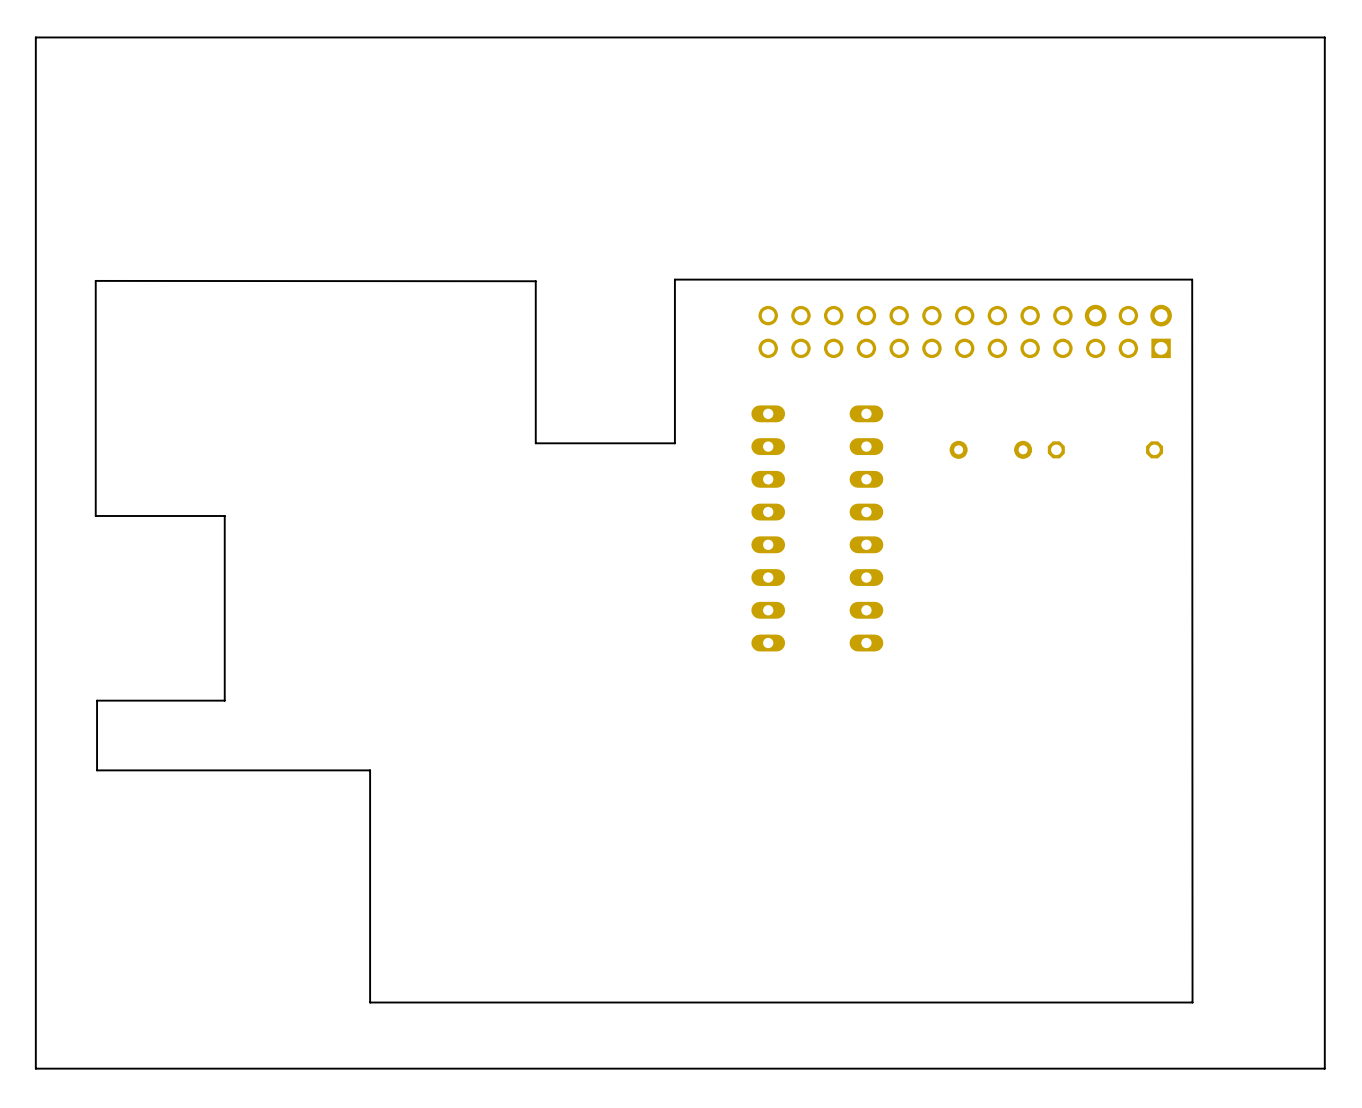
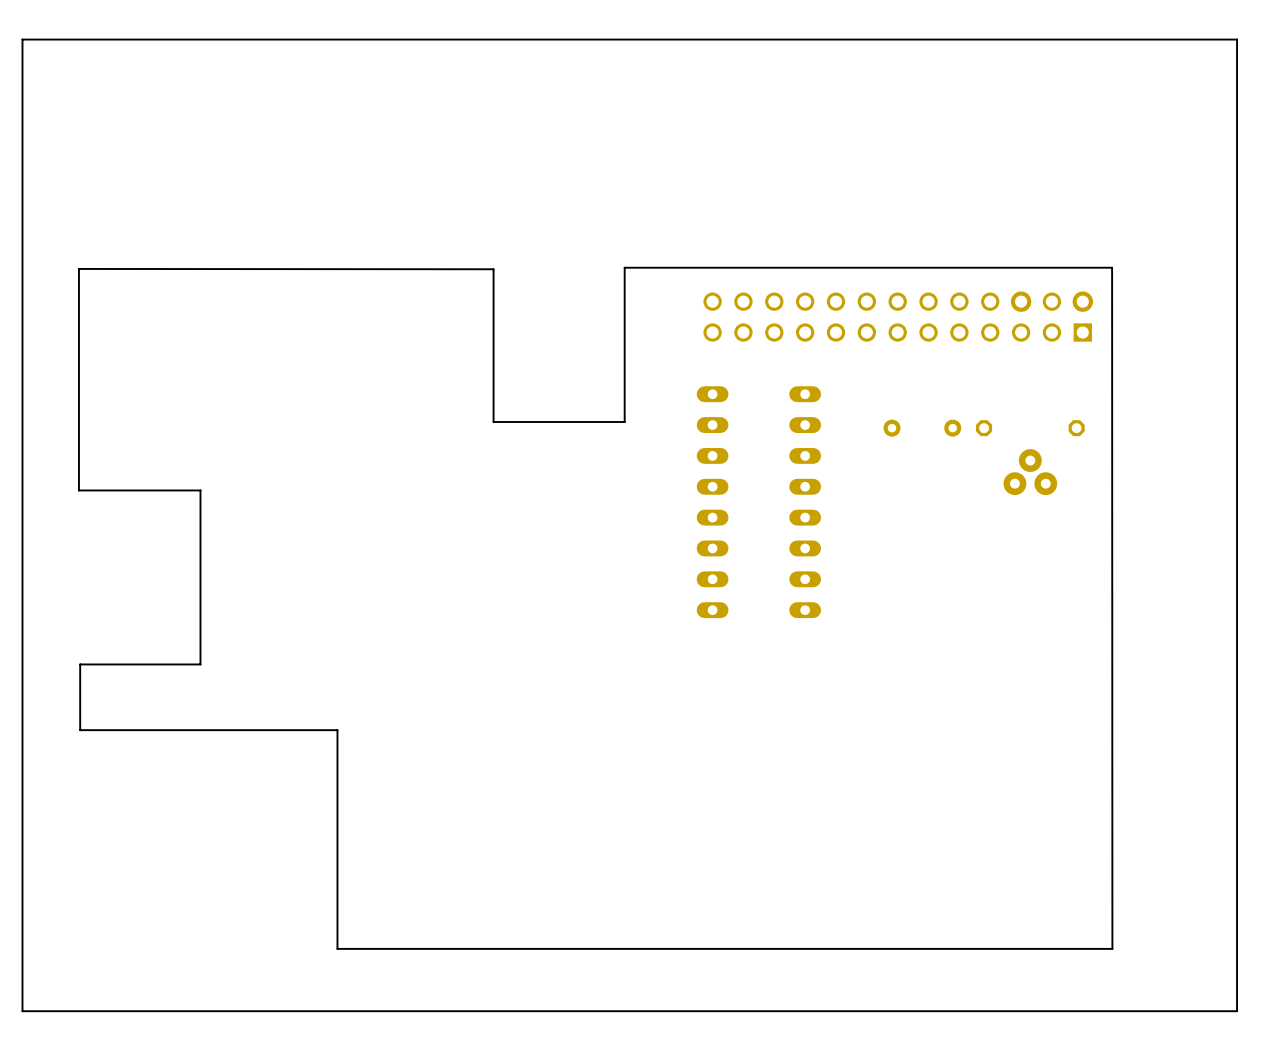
part: none -> (1030, 472)

